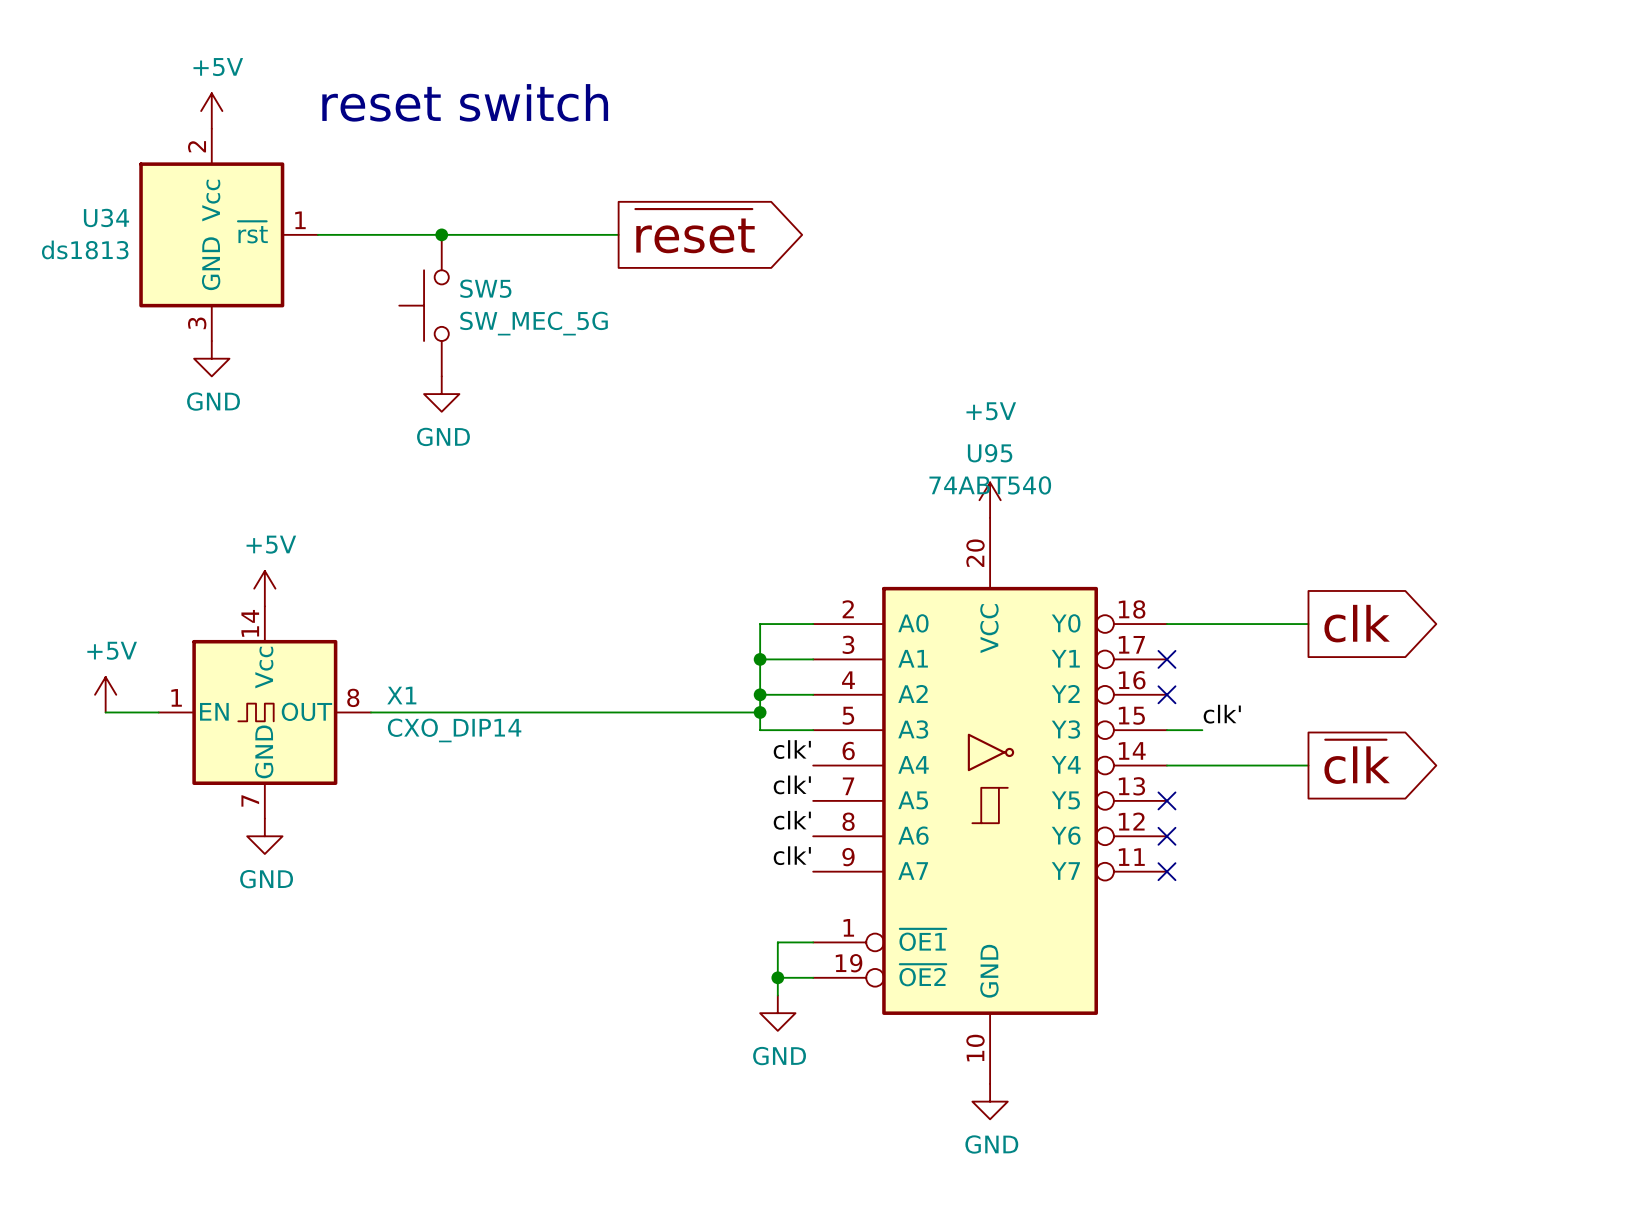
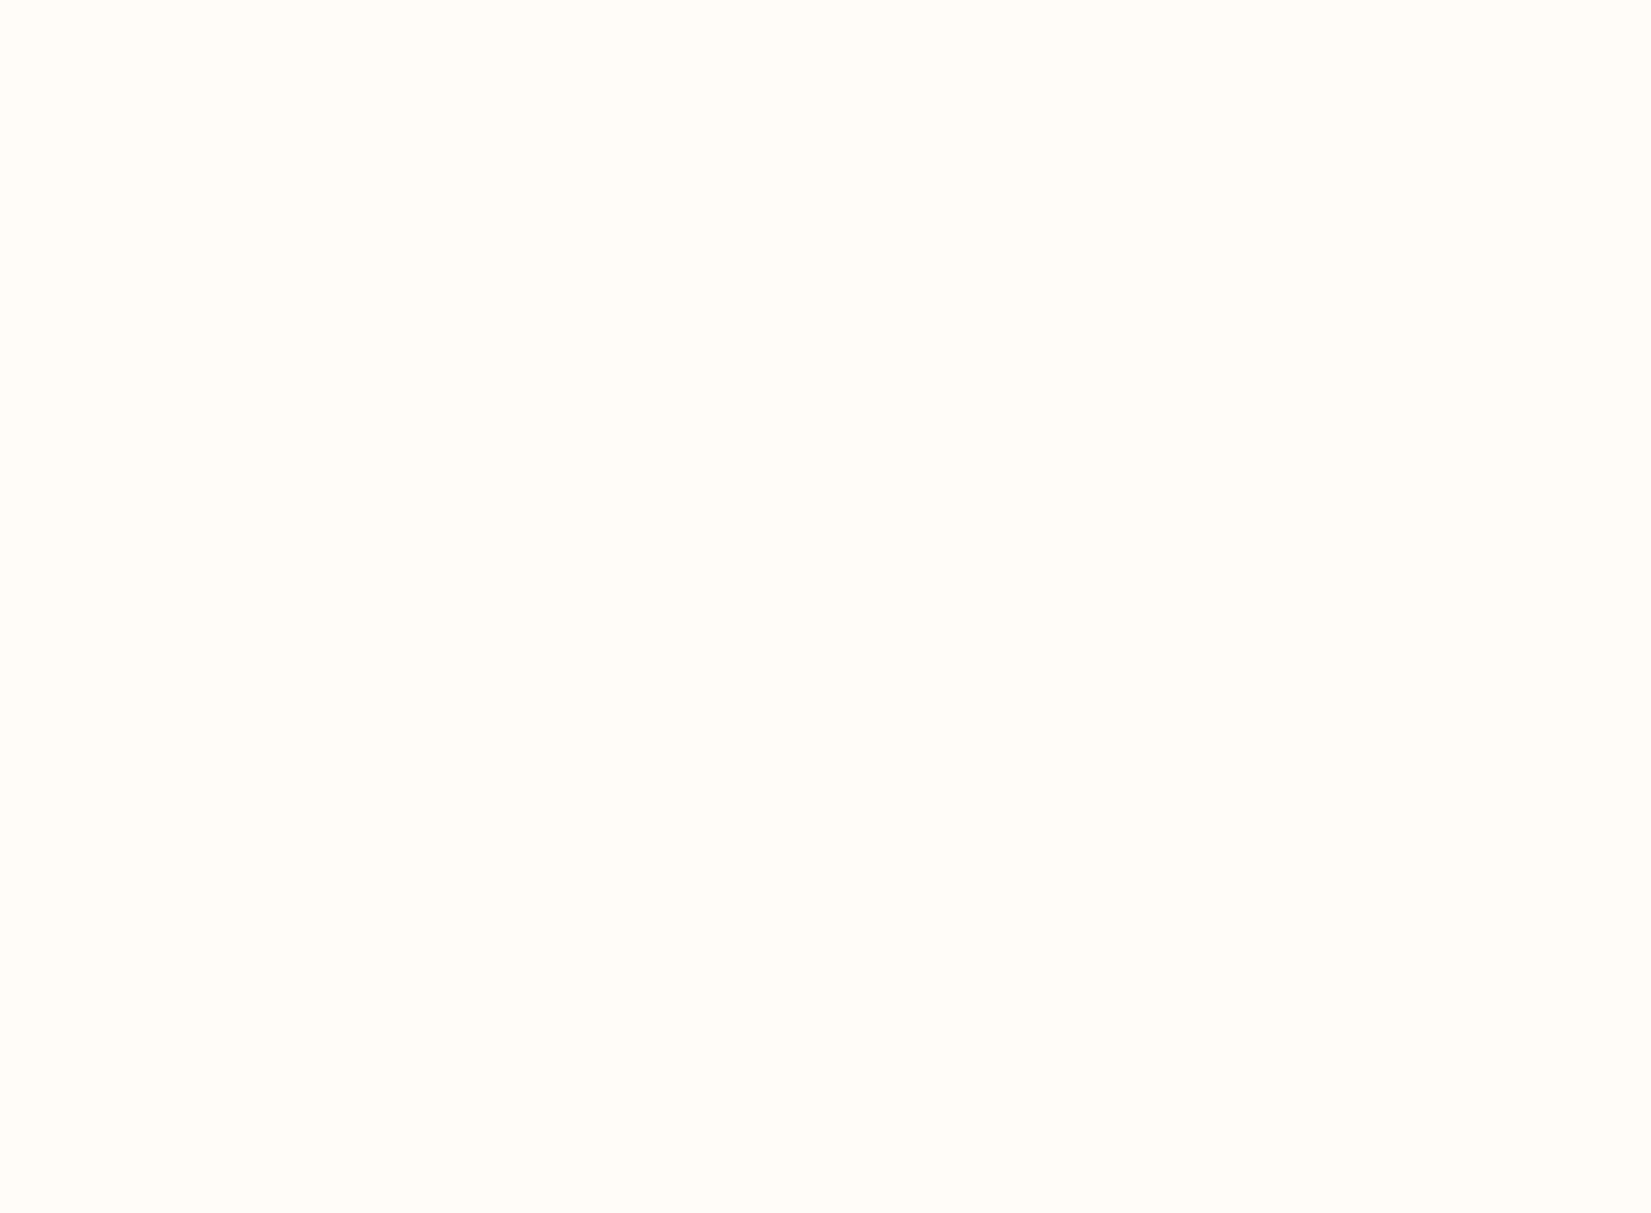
text: reset switch (465, 102) -> none
power symbol: +5V (211, 111) -> none
global label: ~{reset} (695, 231) -> none
U34: ds1813 (228, 234) -> none
wire: (317, 234) (618, 234) -> none
junction: (441, 234) -> none
SW5: SW_MEC_5G (424, 305) -> none
power symbol: GND (211, 358) -> none
power symbol: GND (441, 394) -> none
power symbol: +5V (990, 500) -> none
power symbol: +5V (264, 588) -> none
global label: clk (1357, 623) -> none
wire: (813, 624) (760, 624) (760, 730) (813, 730) -> none
wire: (1166, 624) (1308, 624) -> none
wire: (760, 659) (813, 659) -> none
junction: (760, 659) -> none
no-connect mark: (1166, 659) -> none
power symbol: +5V (105, 694) -> none
wire: (760, 694) (813, 694) -> none
junction: (760, 694) -> none
no-connect mark: (1166, 694) -> none
wire: (105, 712) (158, 712) -> none
X1: CXO_DIP14 (264, 712) -> none
wire: (370, 712) (760, 712) -> none
junction: (760, 712) -> none
label: clk' (1222, 714) -> none
wire: (1166, 730) (1202, 730) -> none
label: clk' (792, 749) -> none
global label: ~{clk} (1357, 761) -> none
wire: (1166, 765) (1308, 765) -> none
label: clk' (792, 784) -> none
U95: 74ABT540 (990, 800) -> none
no-connect mark: (1166, 800) -> none
label: clk' (792, 820) -> none
power symbol: GND (264, 836) -> none
no-connect mark: (1166, 836) -> none
label: clk' (792, 855) -> none
no-connect mark: (1166, 871) -> none
wire: (813, 942) (777, 942) (777, 995) -> none
wire: (777, 977) (813, 977) -> none
junction: (777, 977) -> none
power symbol: GND (777, 1013) -> none
power symbol: GND (990, 1101) -> none

